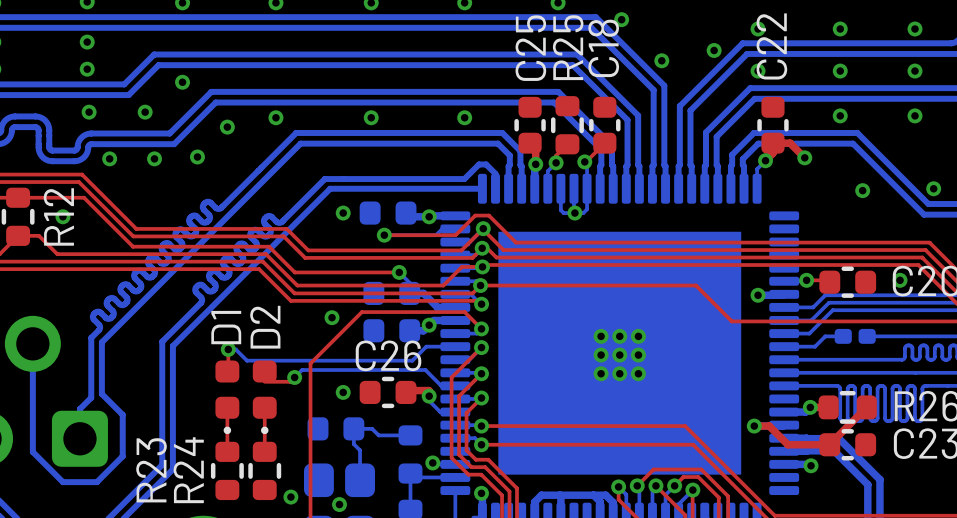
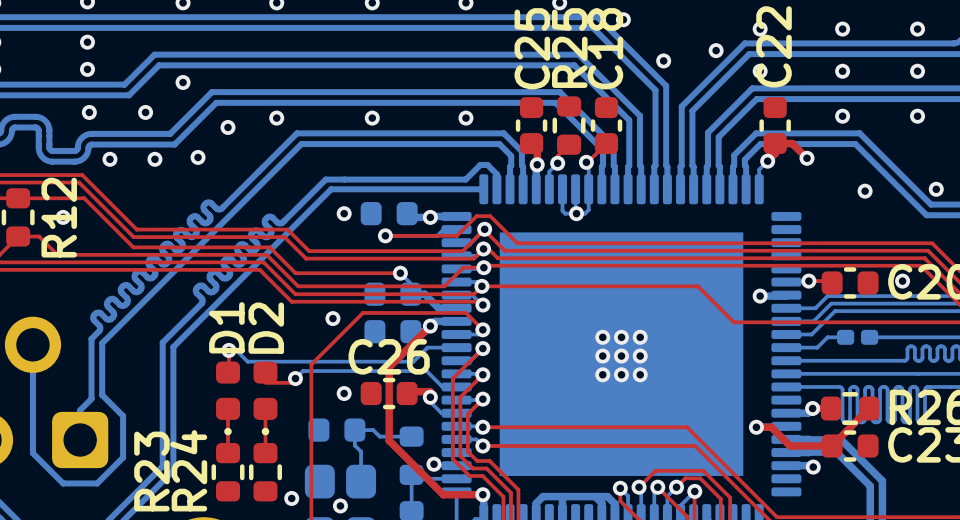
top track: none -> (430, 326) (389, 367) (389, 440) (443, 494) (482, 494)

